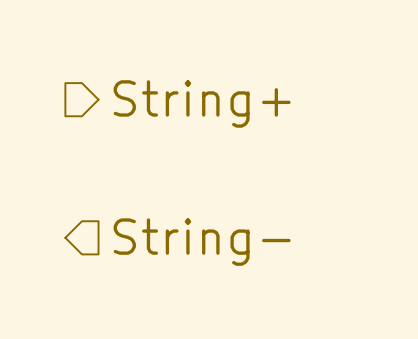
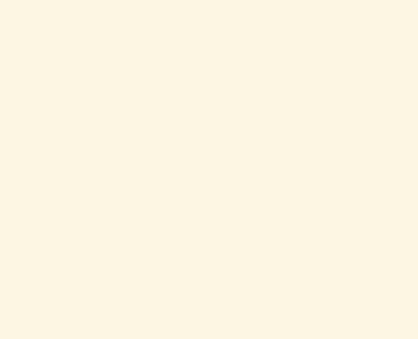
hierarchical label: String+ (202, 103) -> none
hierarchical label: String- (202, 242) -> none

